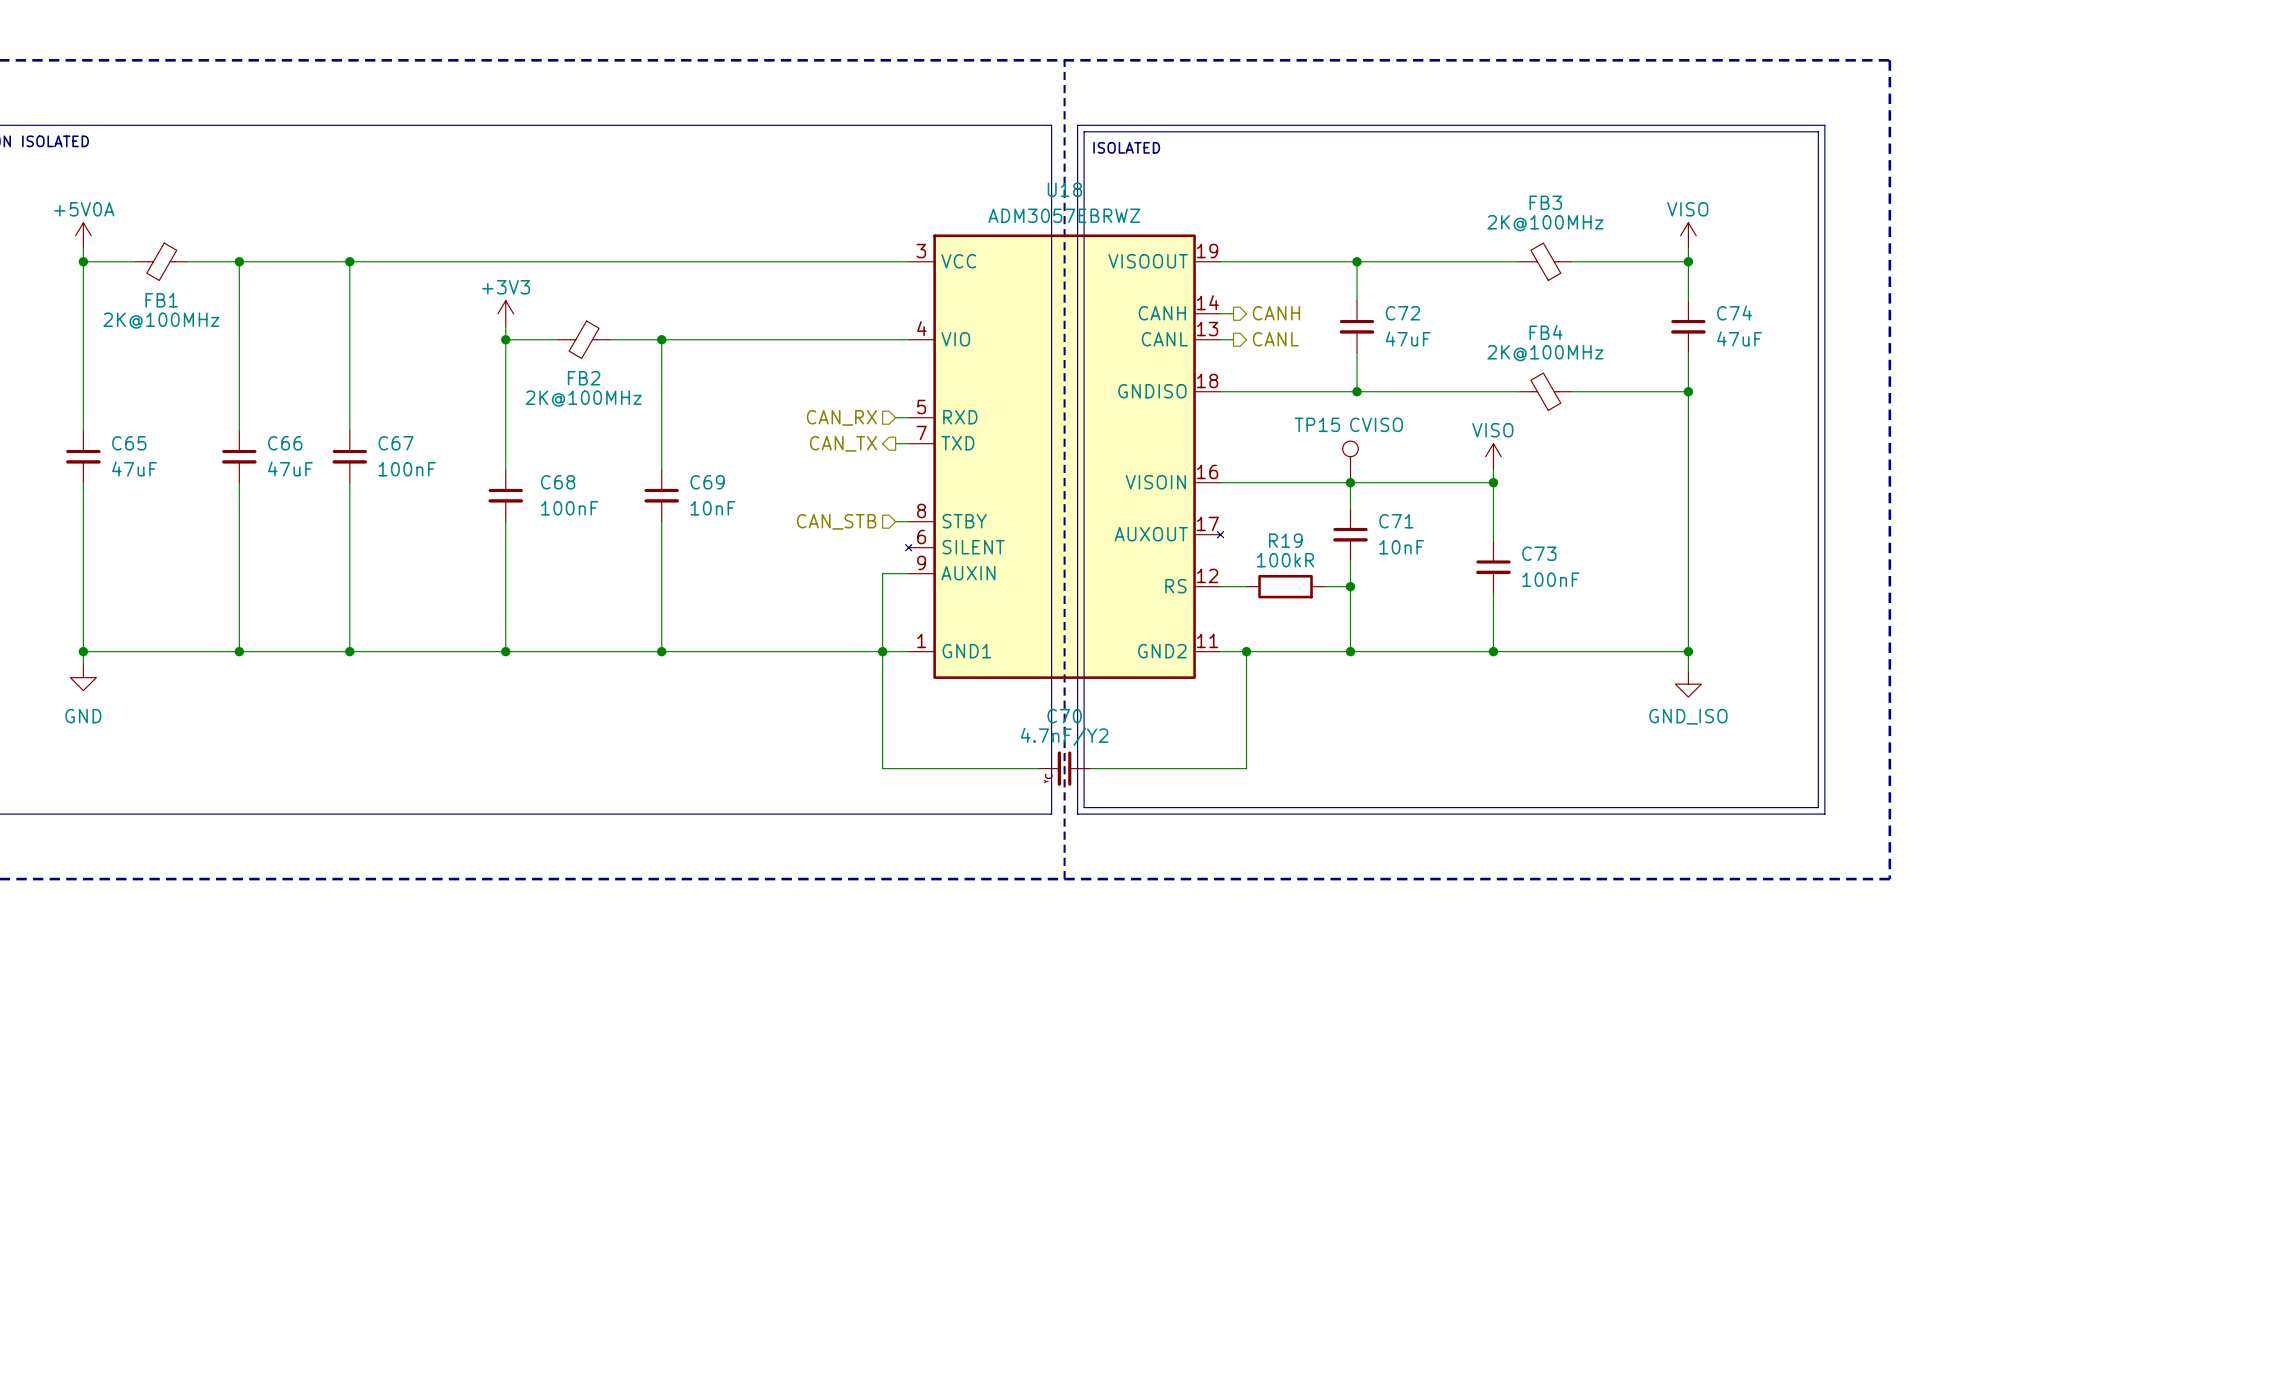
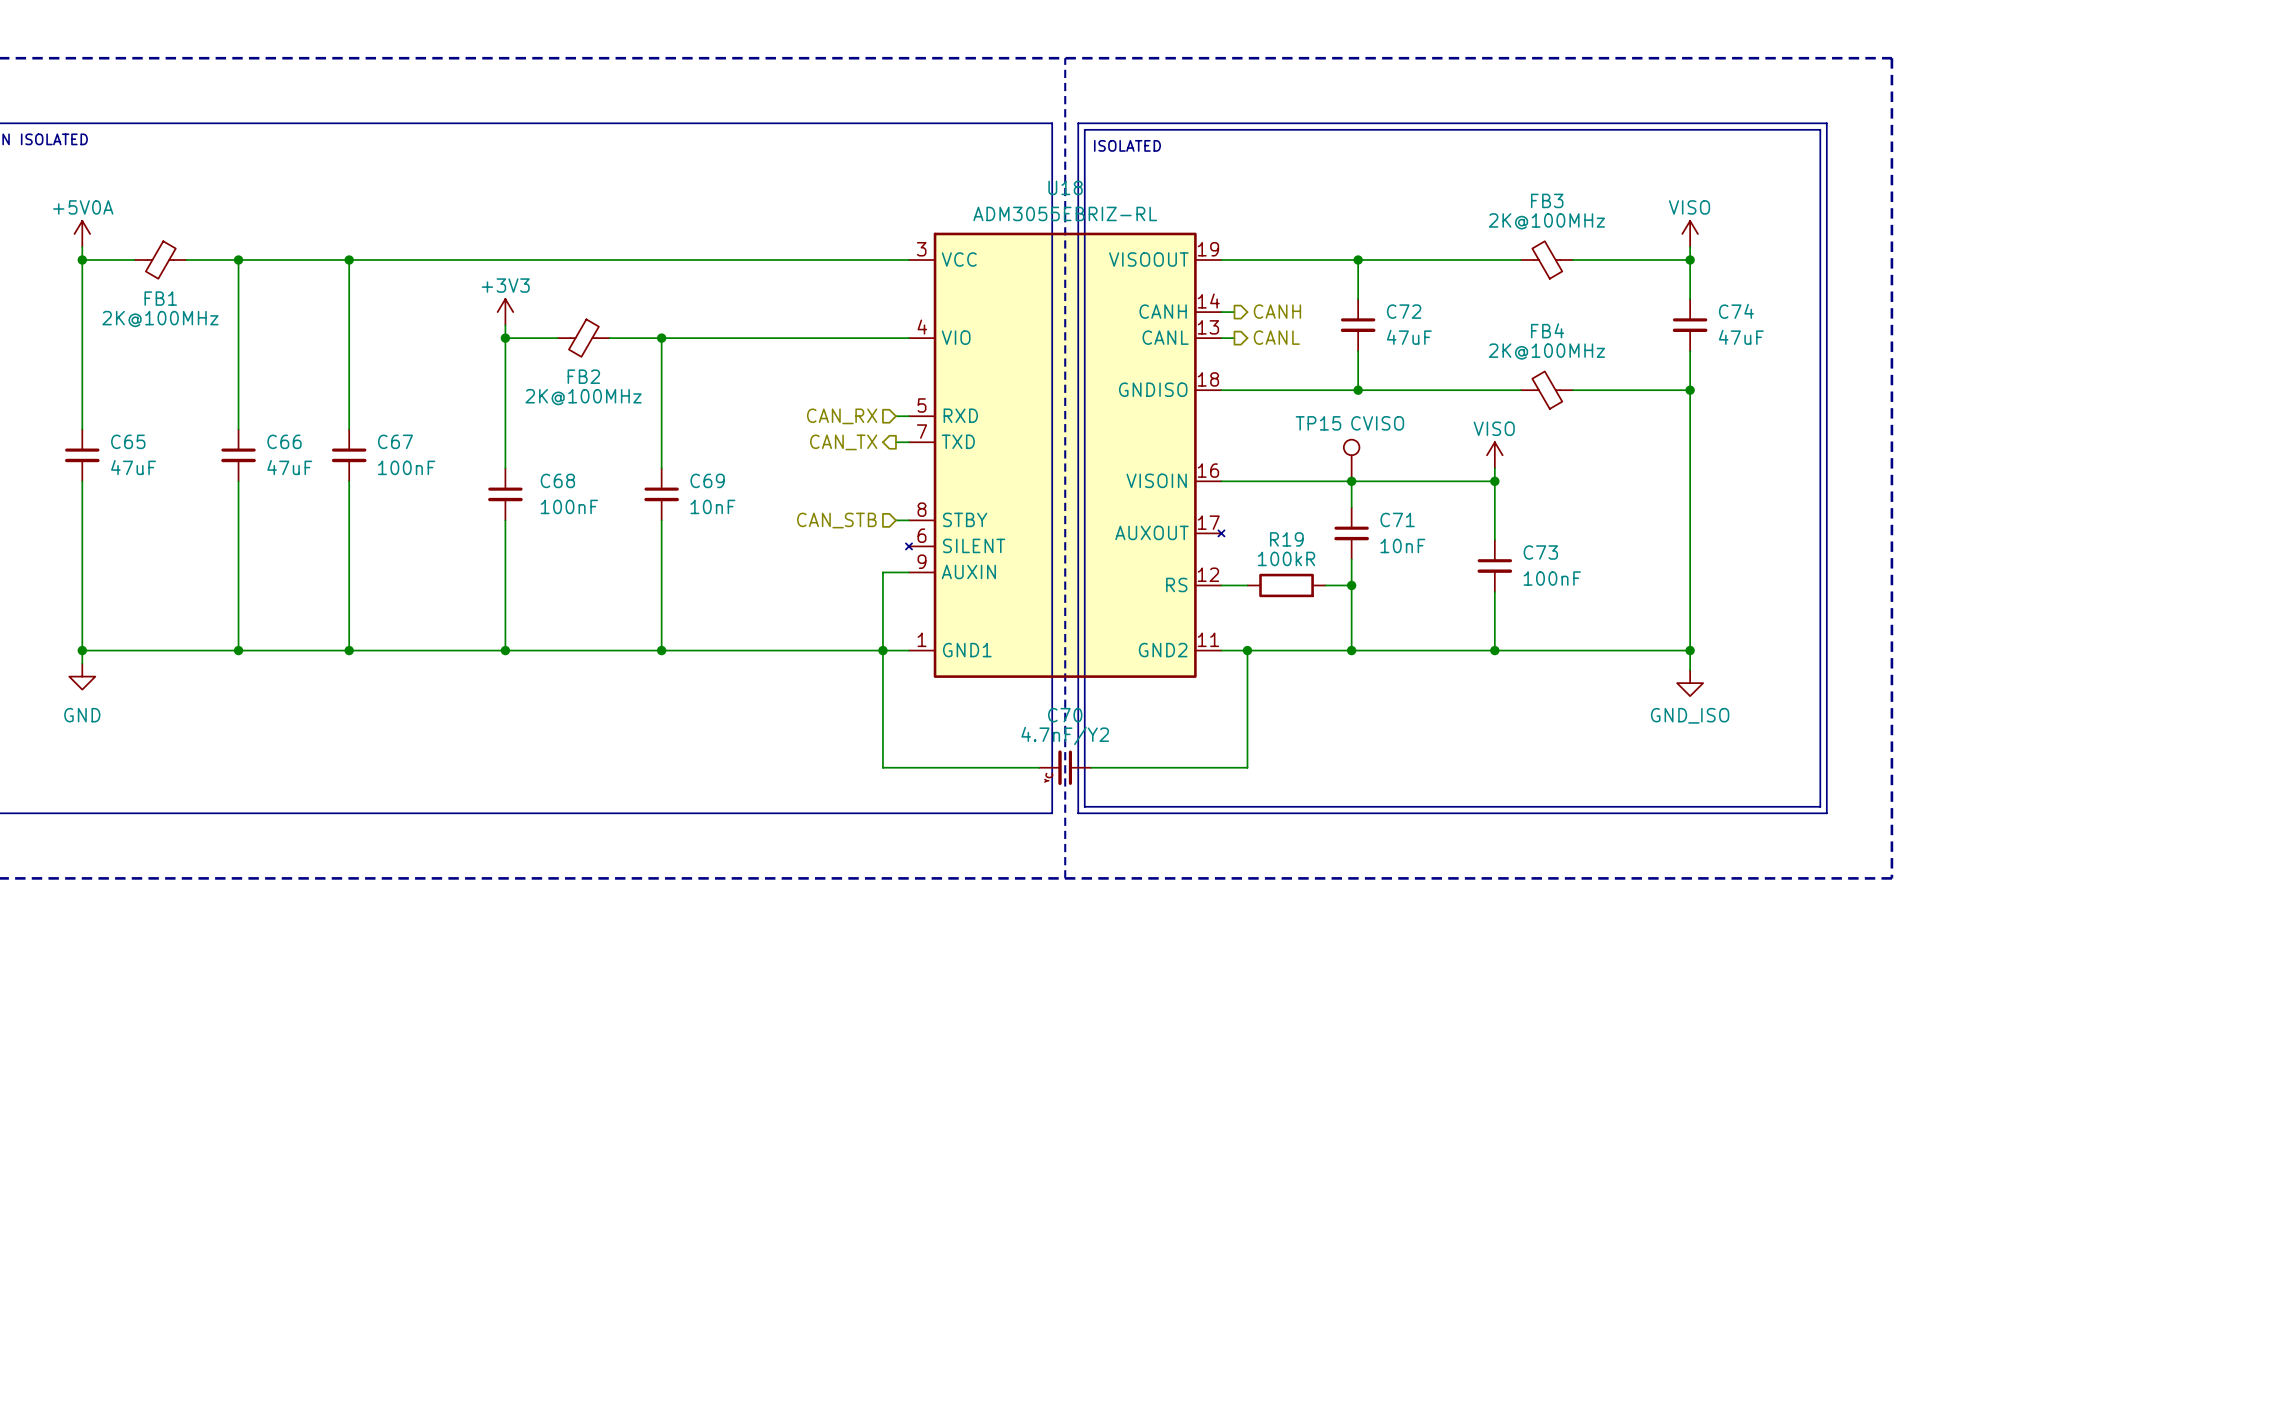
U18 value: ADM3057EBRWZ (1064, 215) -> ADM3055EBRIZ-RL (1065, 213)

